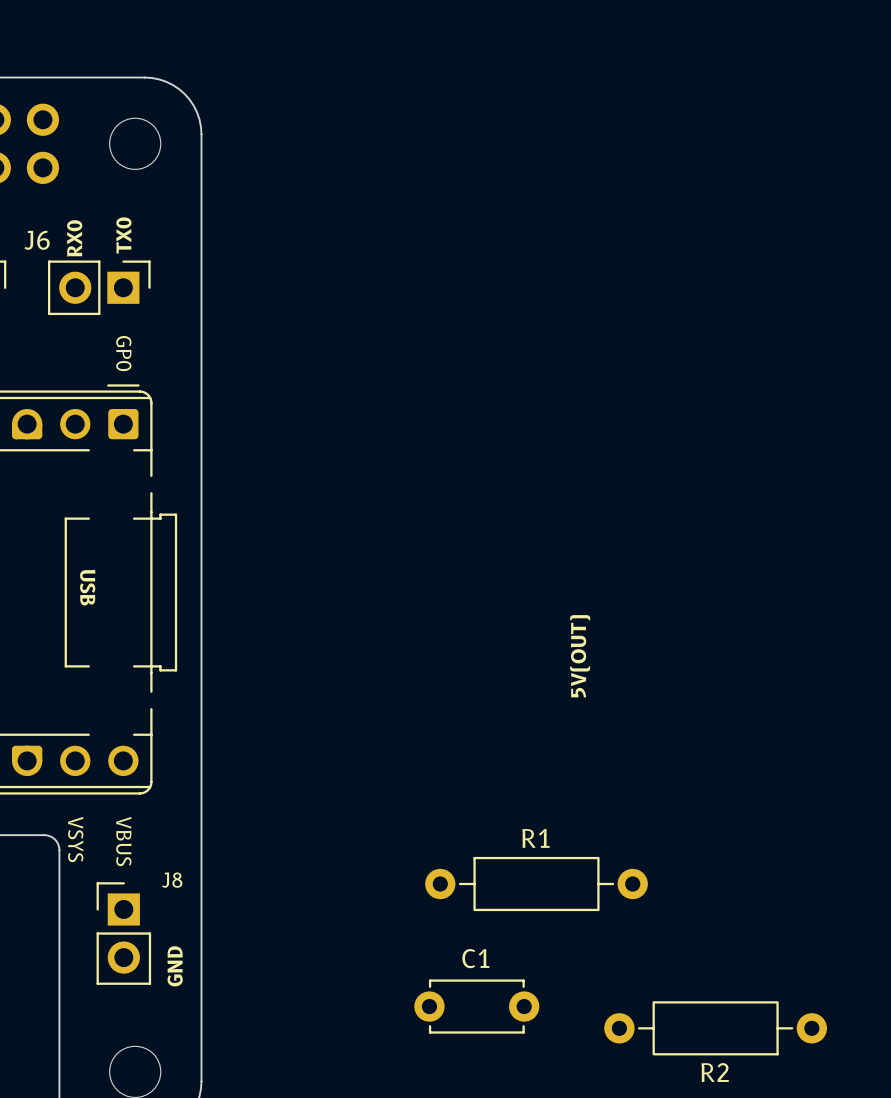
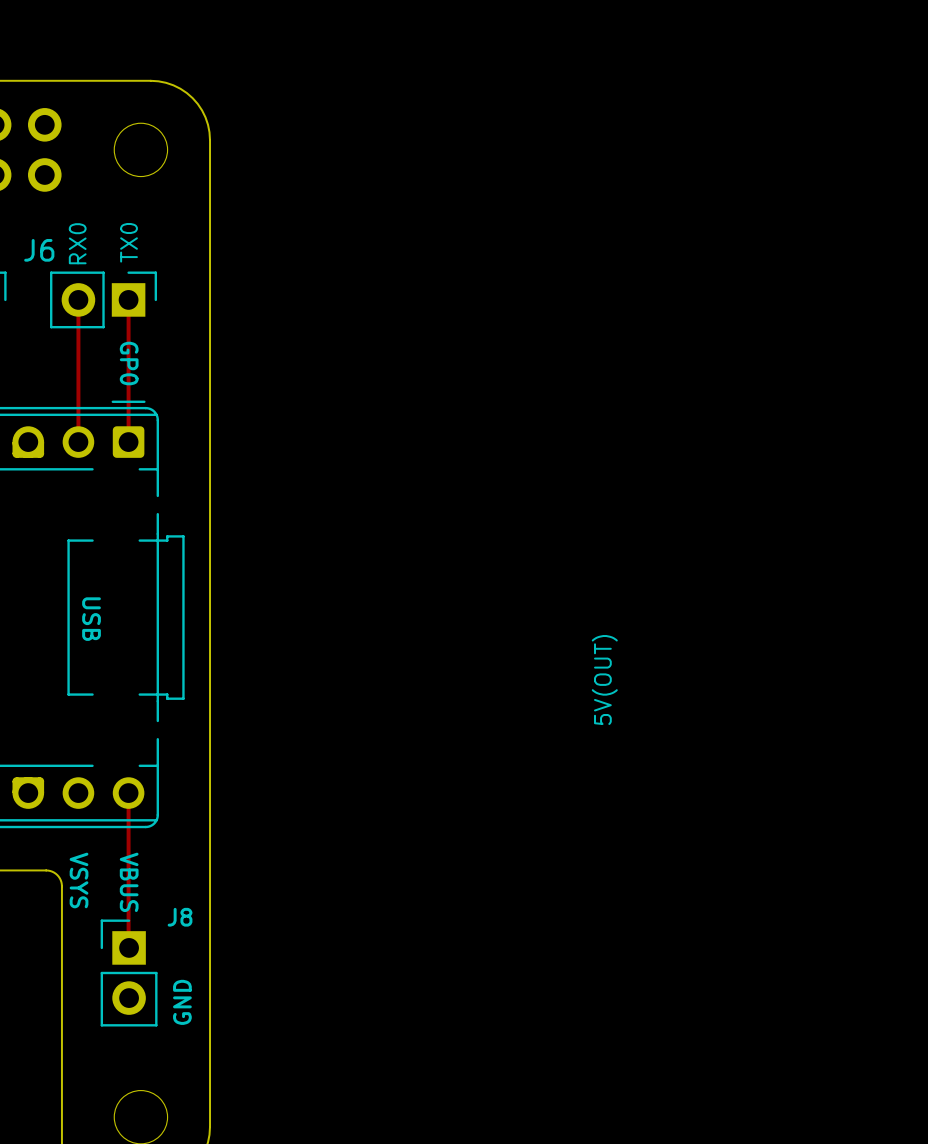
track: none -> (78, 299) (78, 442)
track: none -> (128, 299) (128, 442)
track: none -> (128, 793) (129, 947)
R1: (536, 884) -> none
C1: (476, 1006) -> none
R2: (715, 1028) -> none

